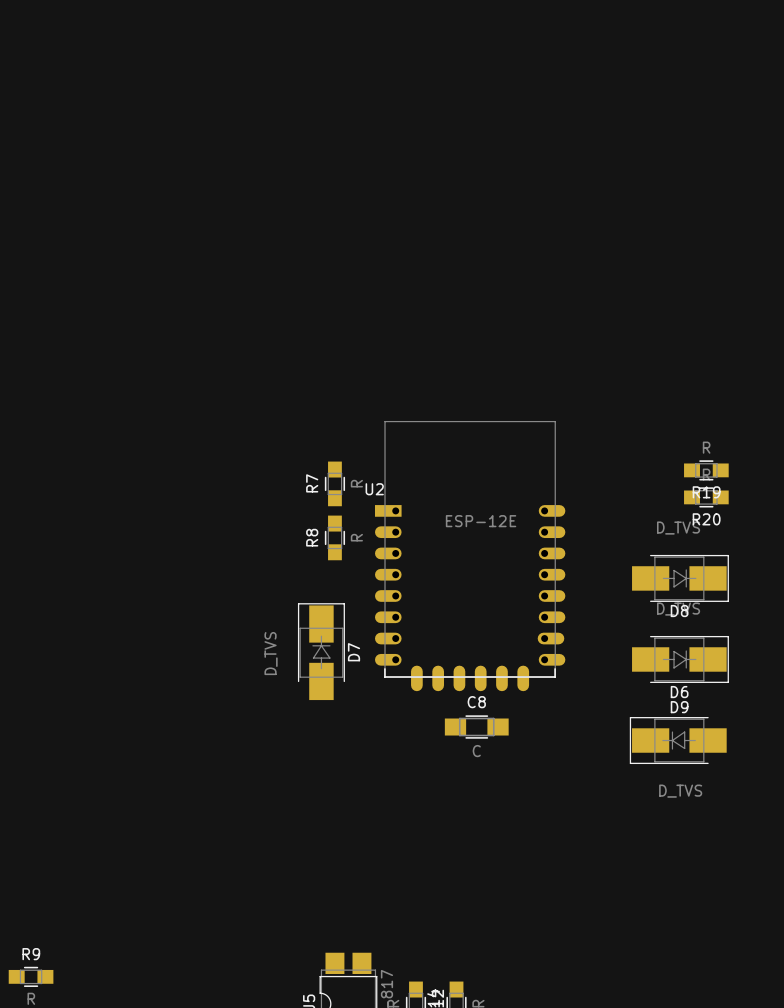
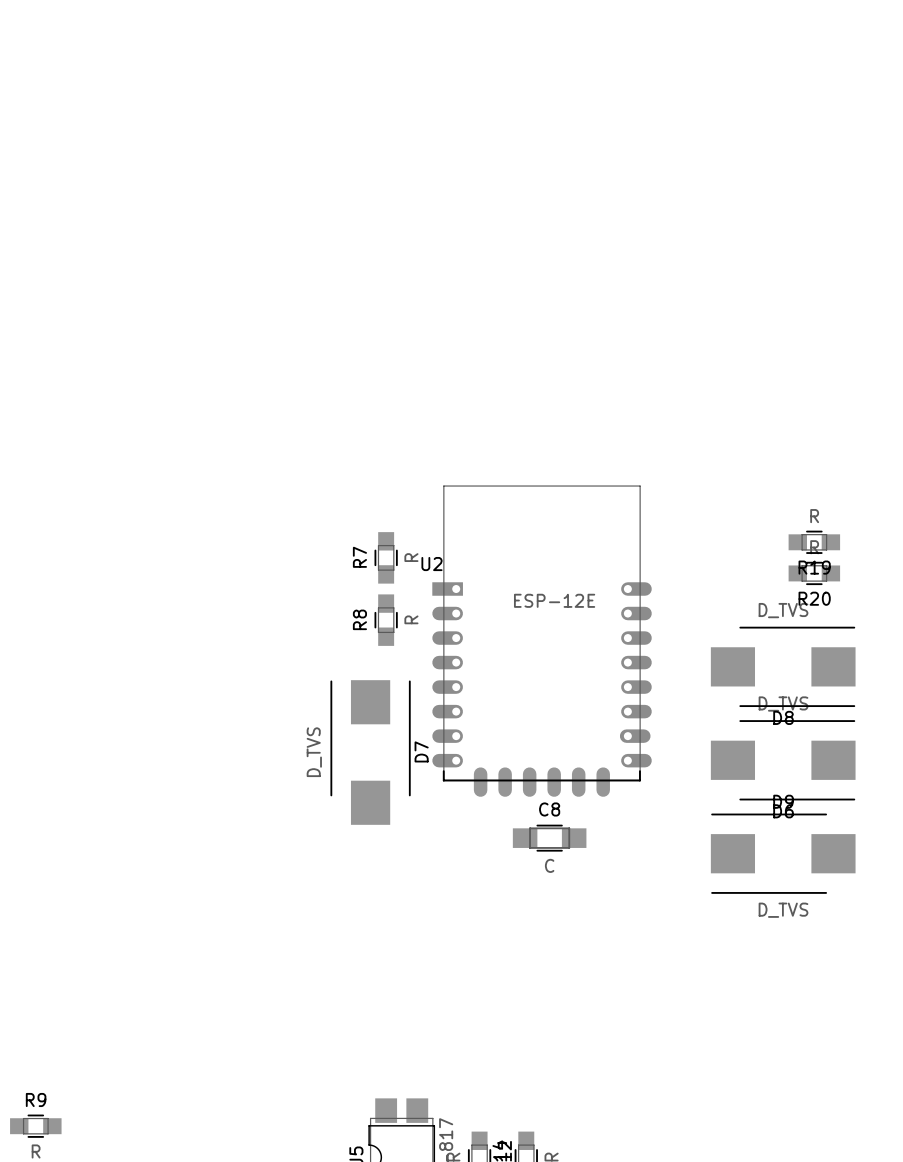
D8 footprint: [632, 554, 729, 602] -> [710, 626, 856, 708]
D7 footprint: [297, 603, 345, 701] -> [330, 680, 411, 825]
D6 footprint: [632, 635, 729, 683] -> [710, 720, 856, 801]
D9 footprint: [629, 717, 727, 765] -> [710, 813, 856, 894]

